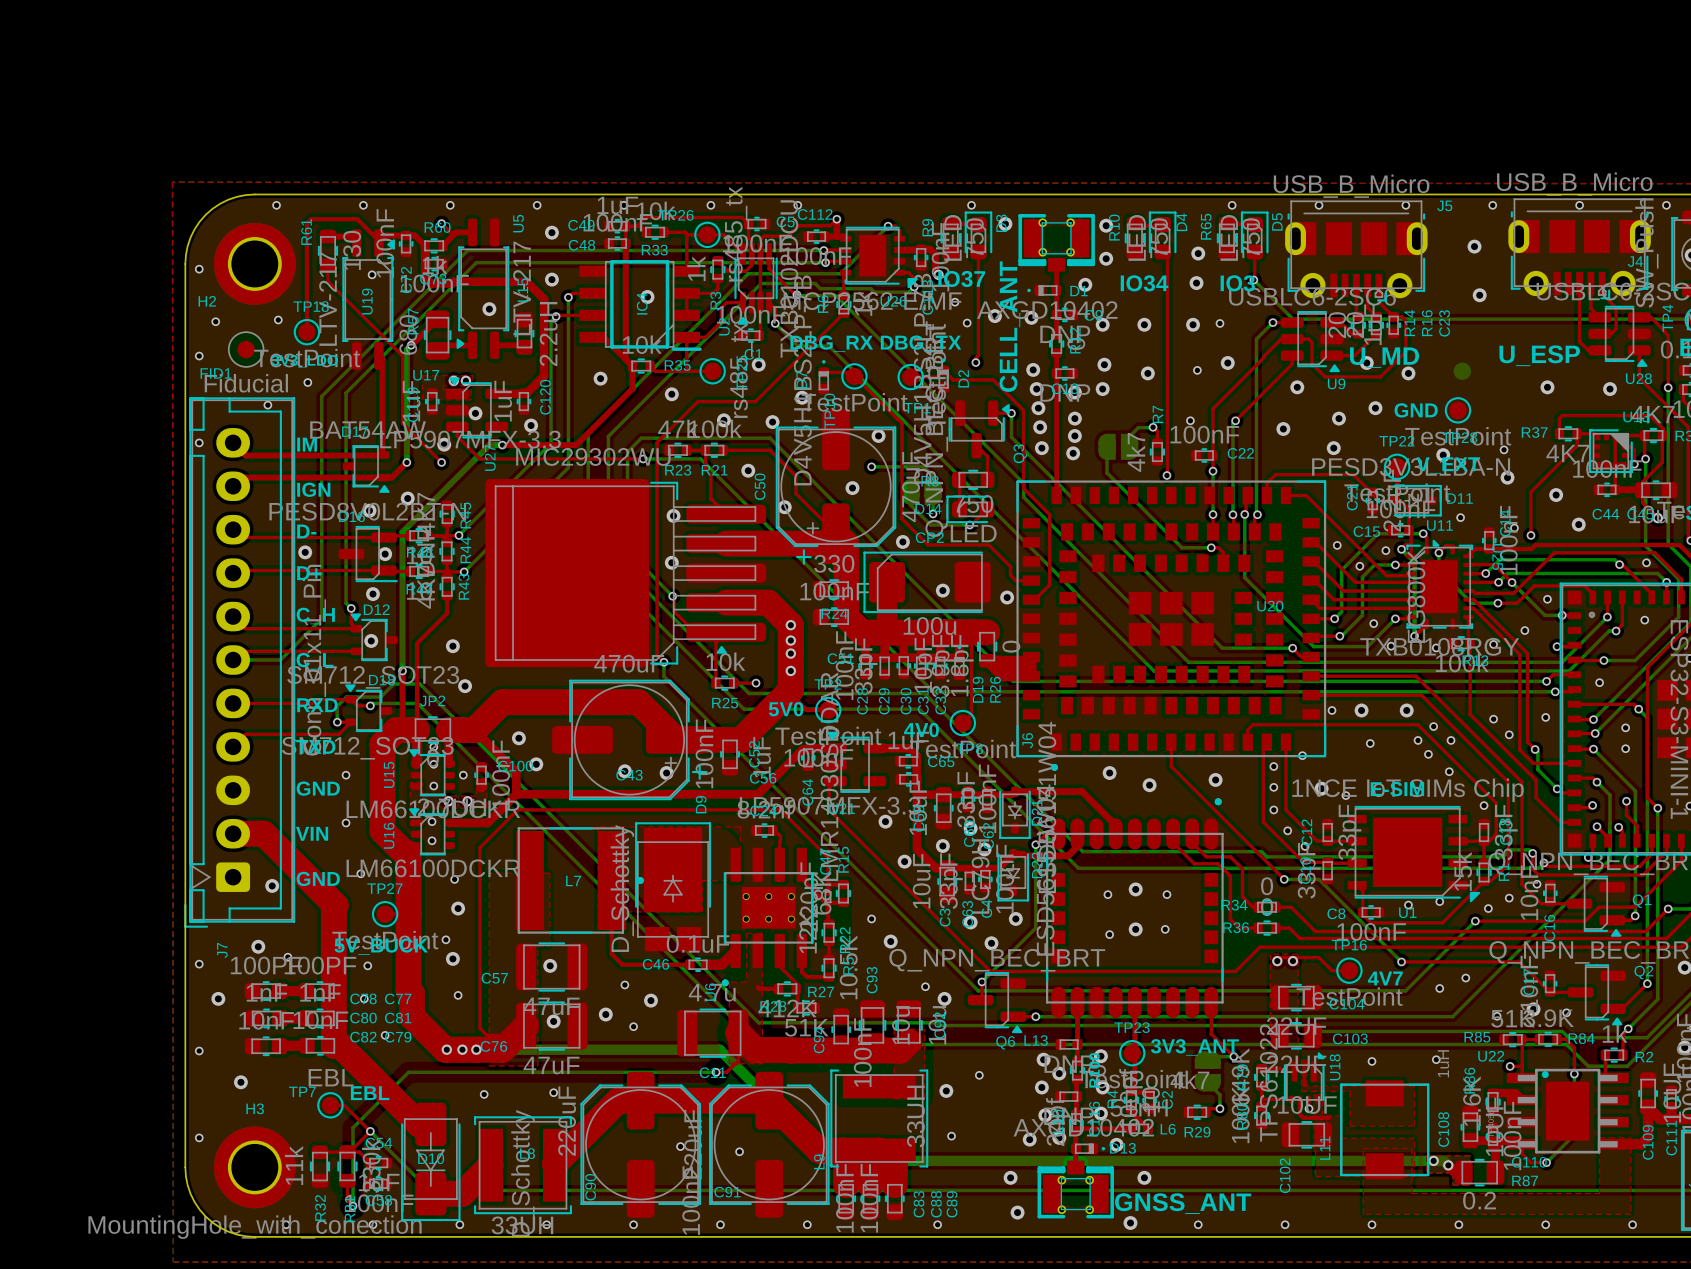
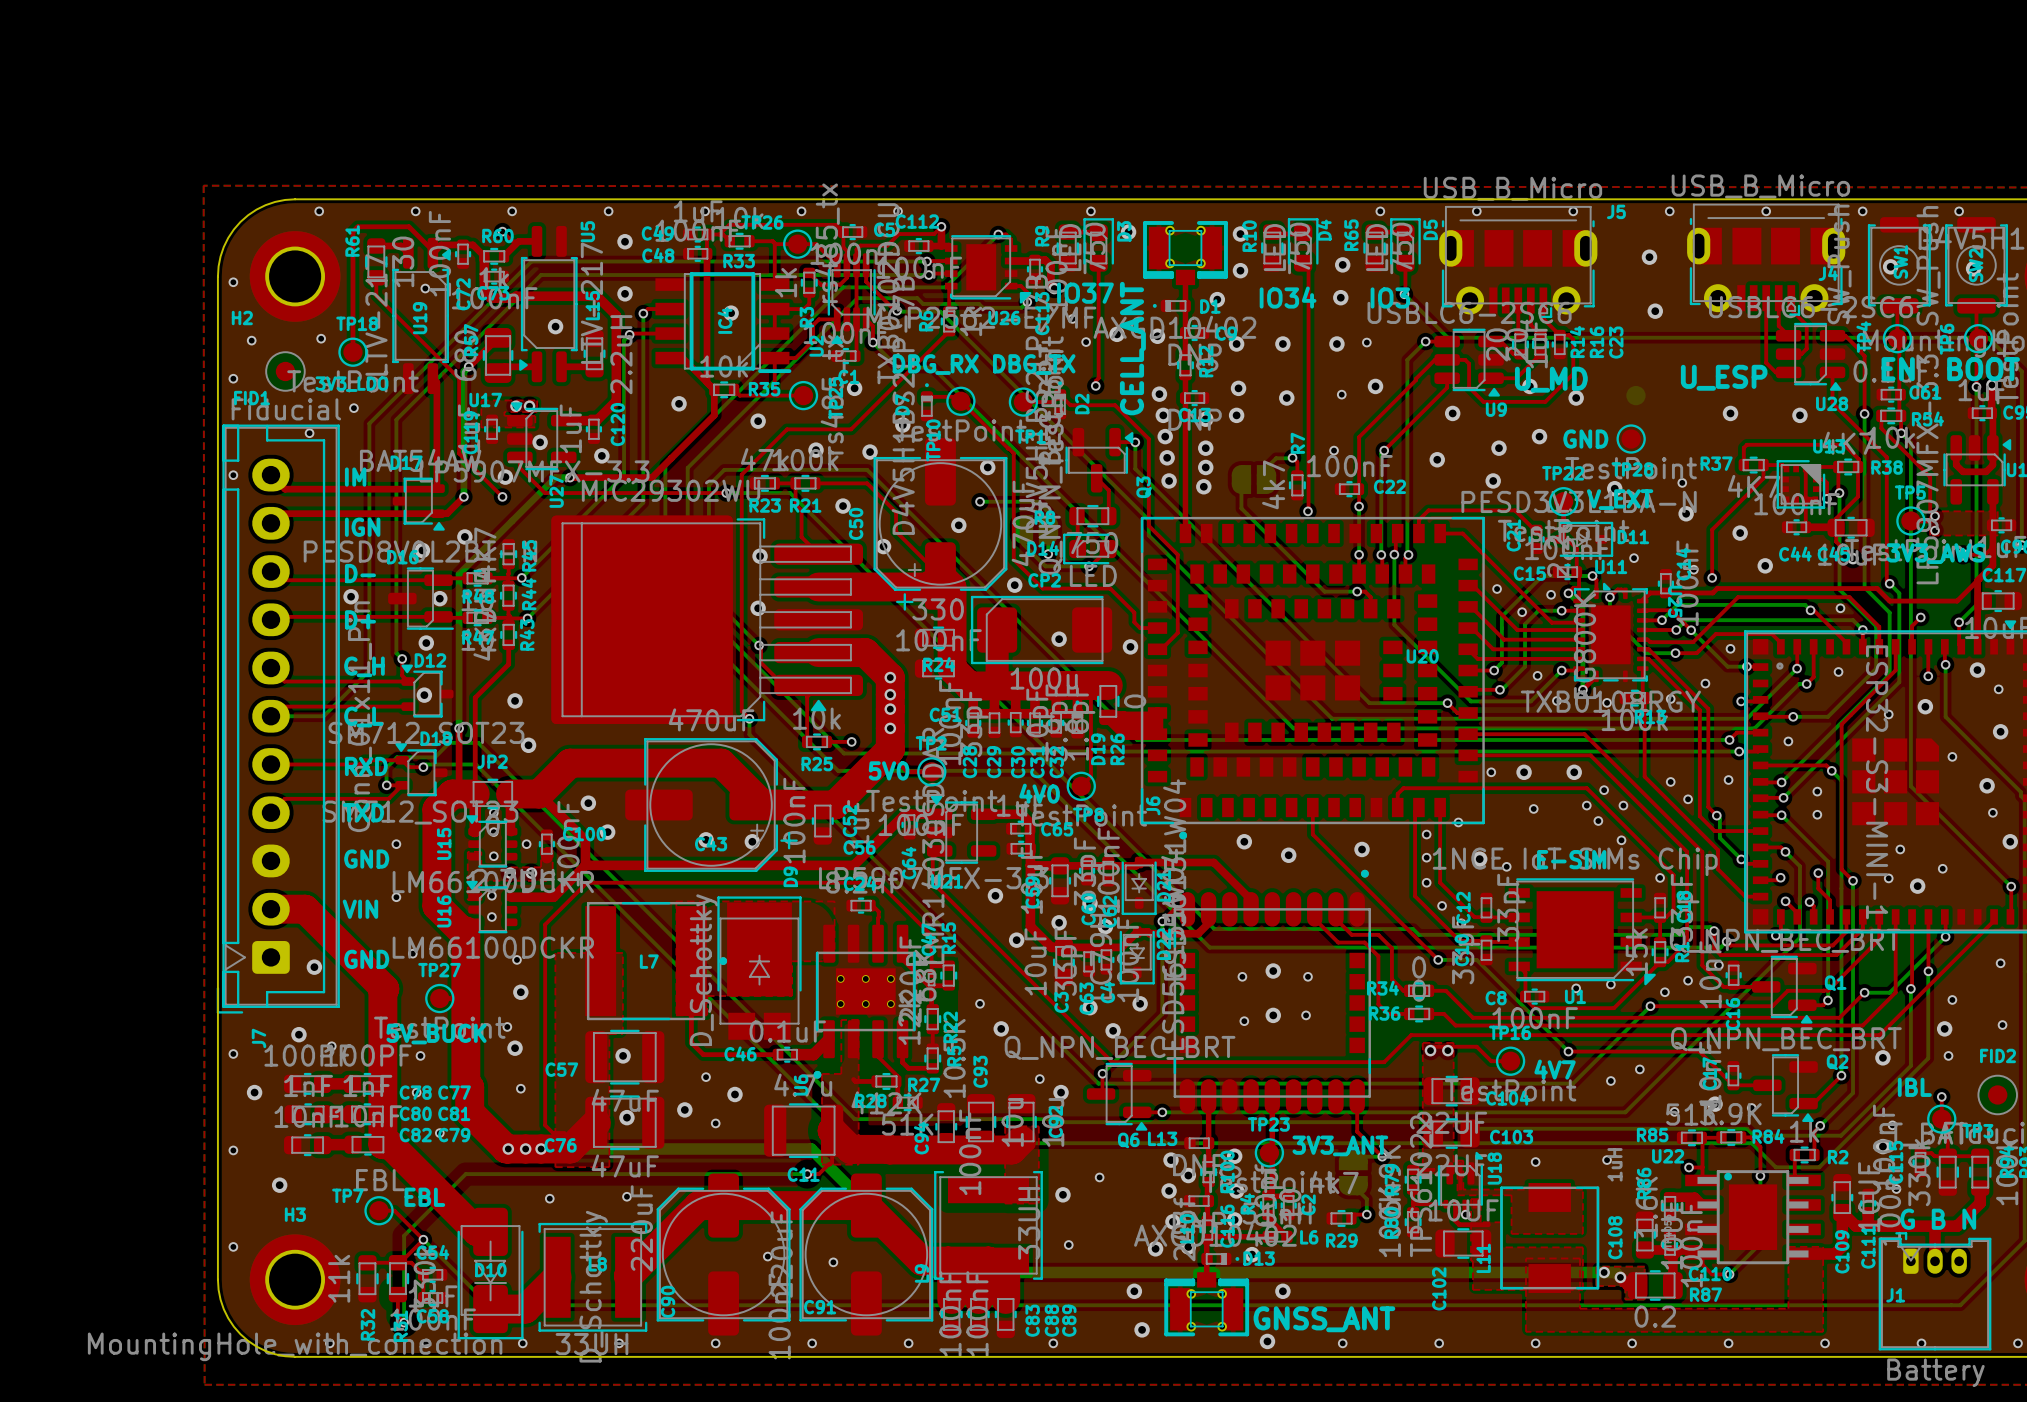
U17 footprint: [485, 479, 767, 667] -> [551, 515, 864, 724]

